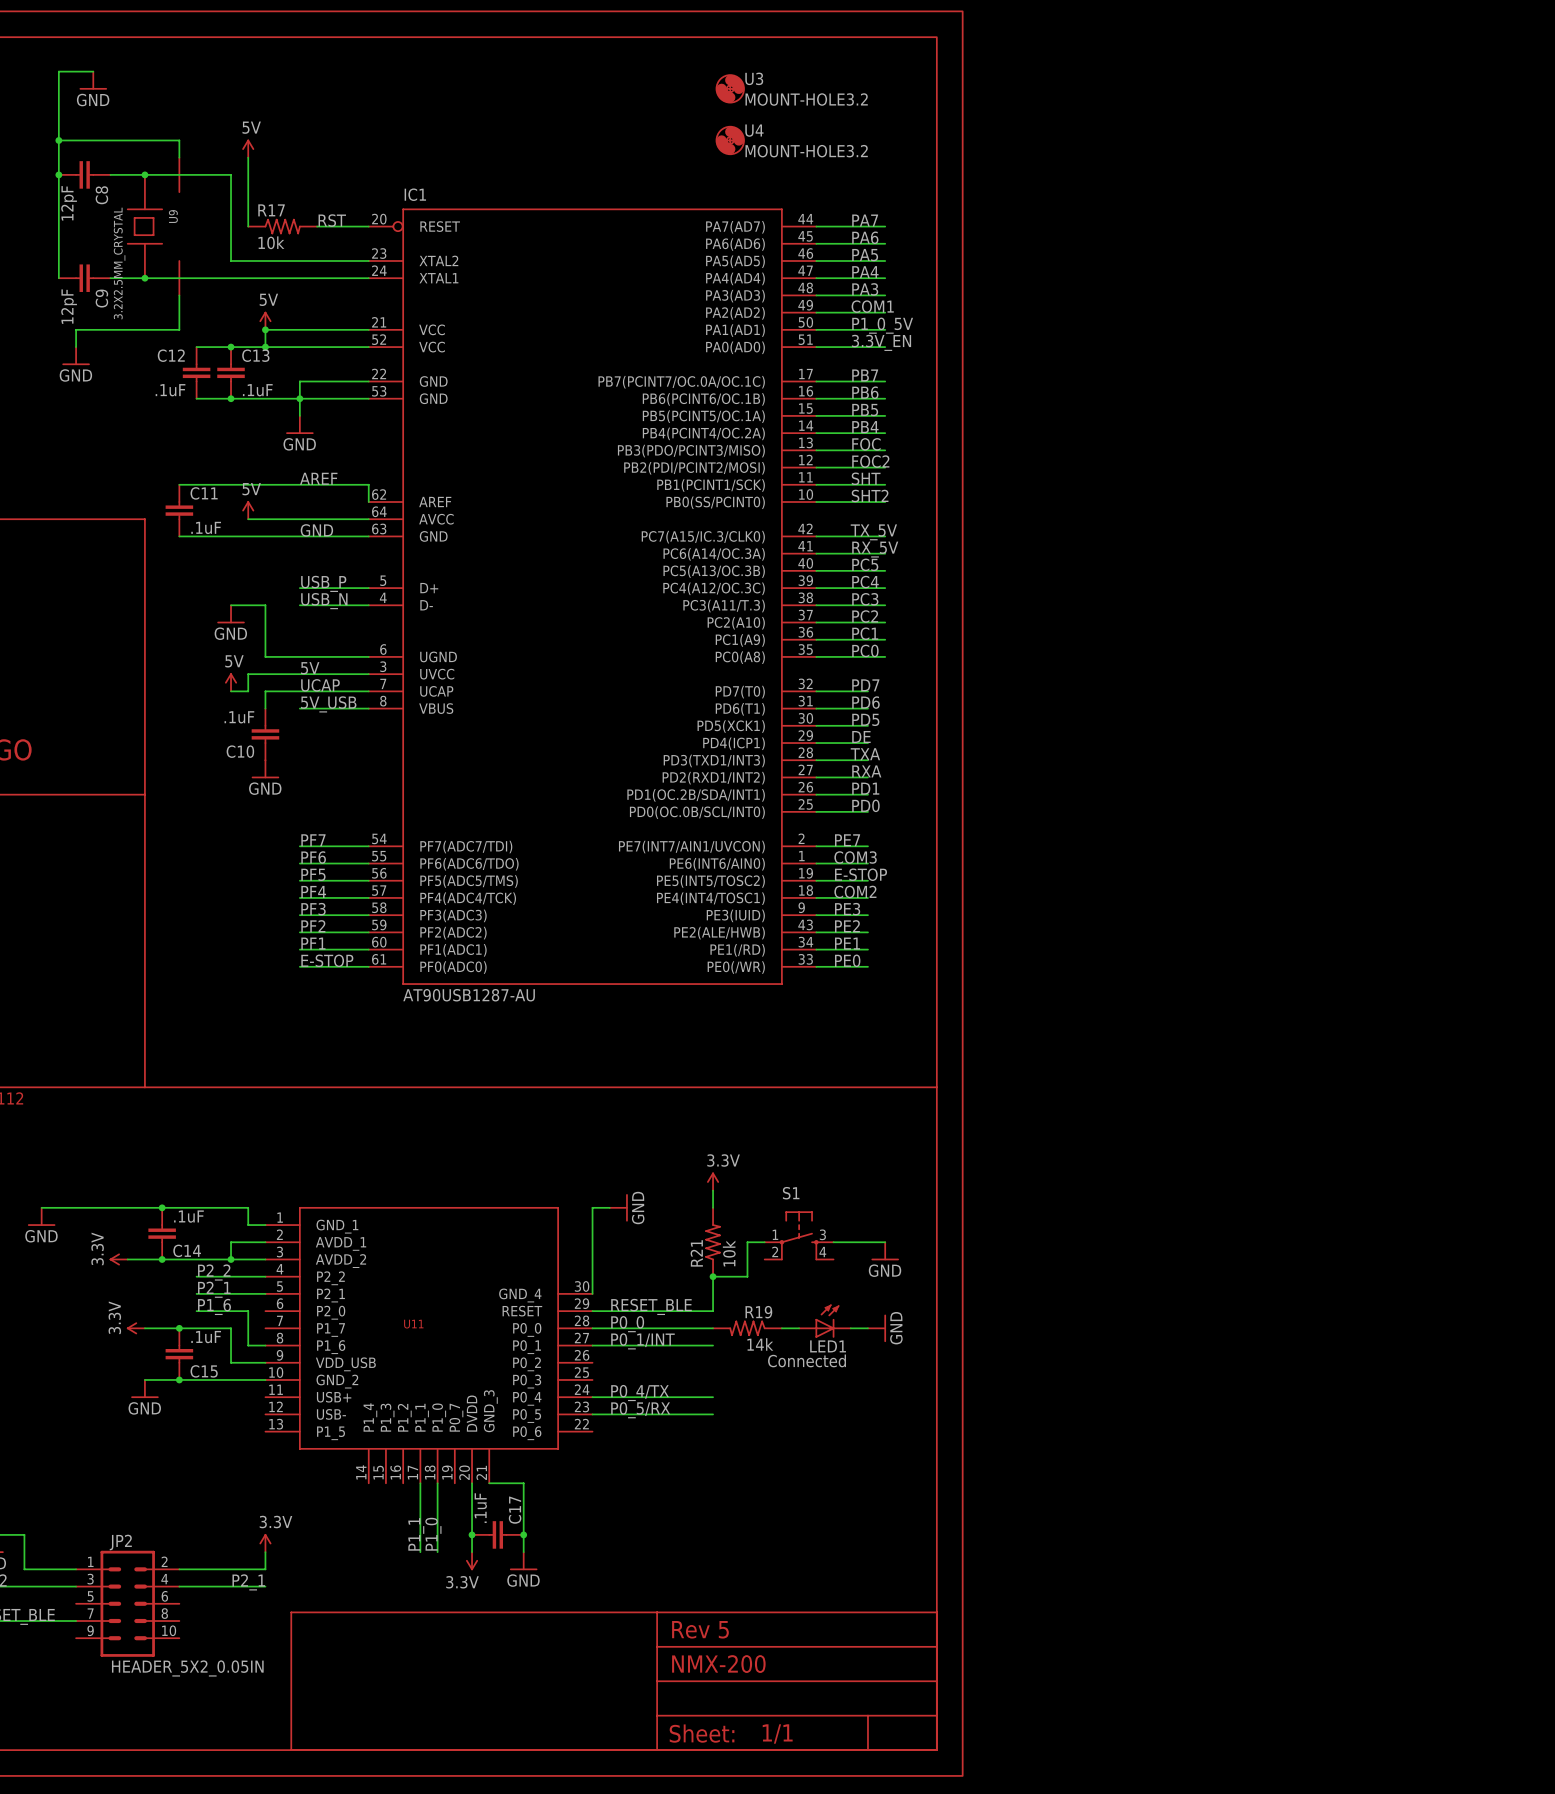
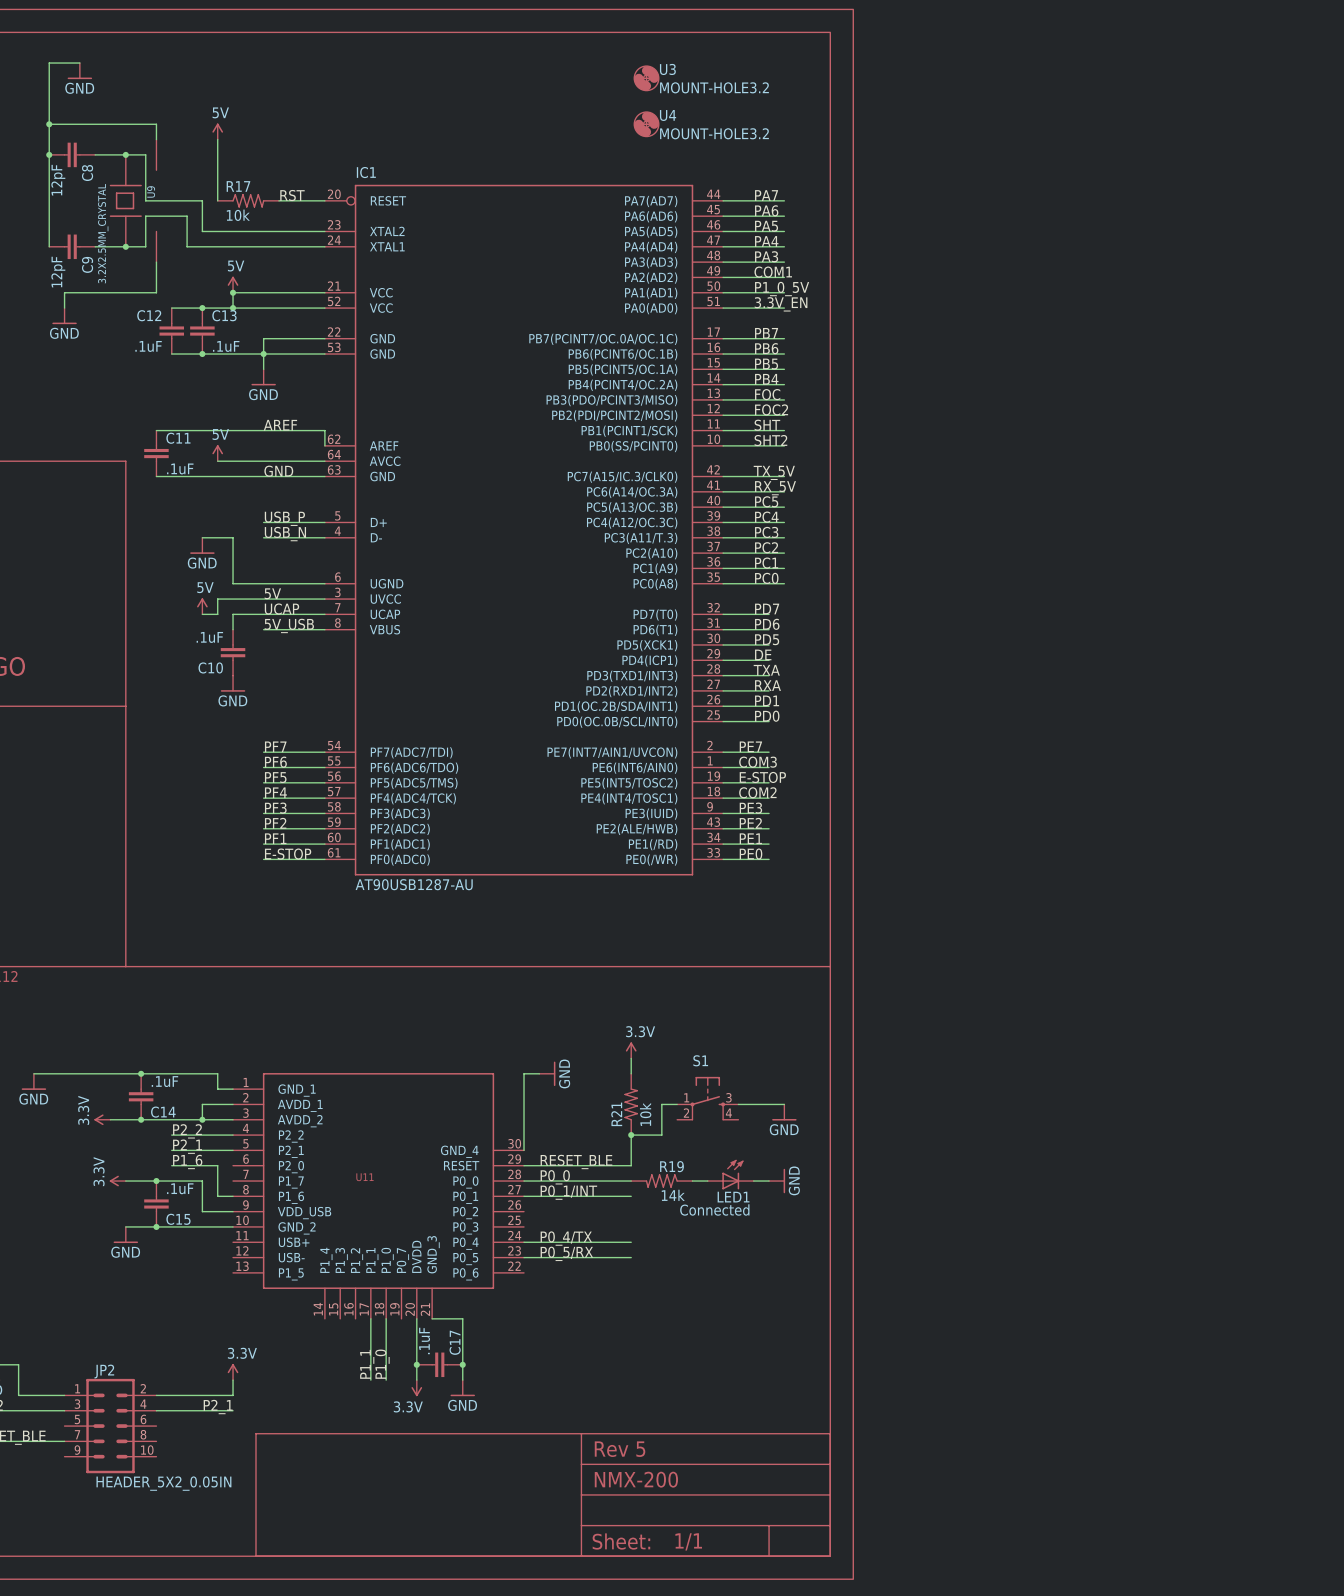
wire: (167, 174) (231, 174) (231, 226) -> (145, 154) (145, 200) (202, 200)
wire: (167, 278) (213, 278) -> (145, 246) (145, 216) (187, 216) (187, 246)

